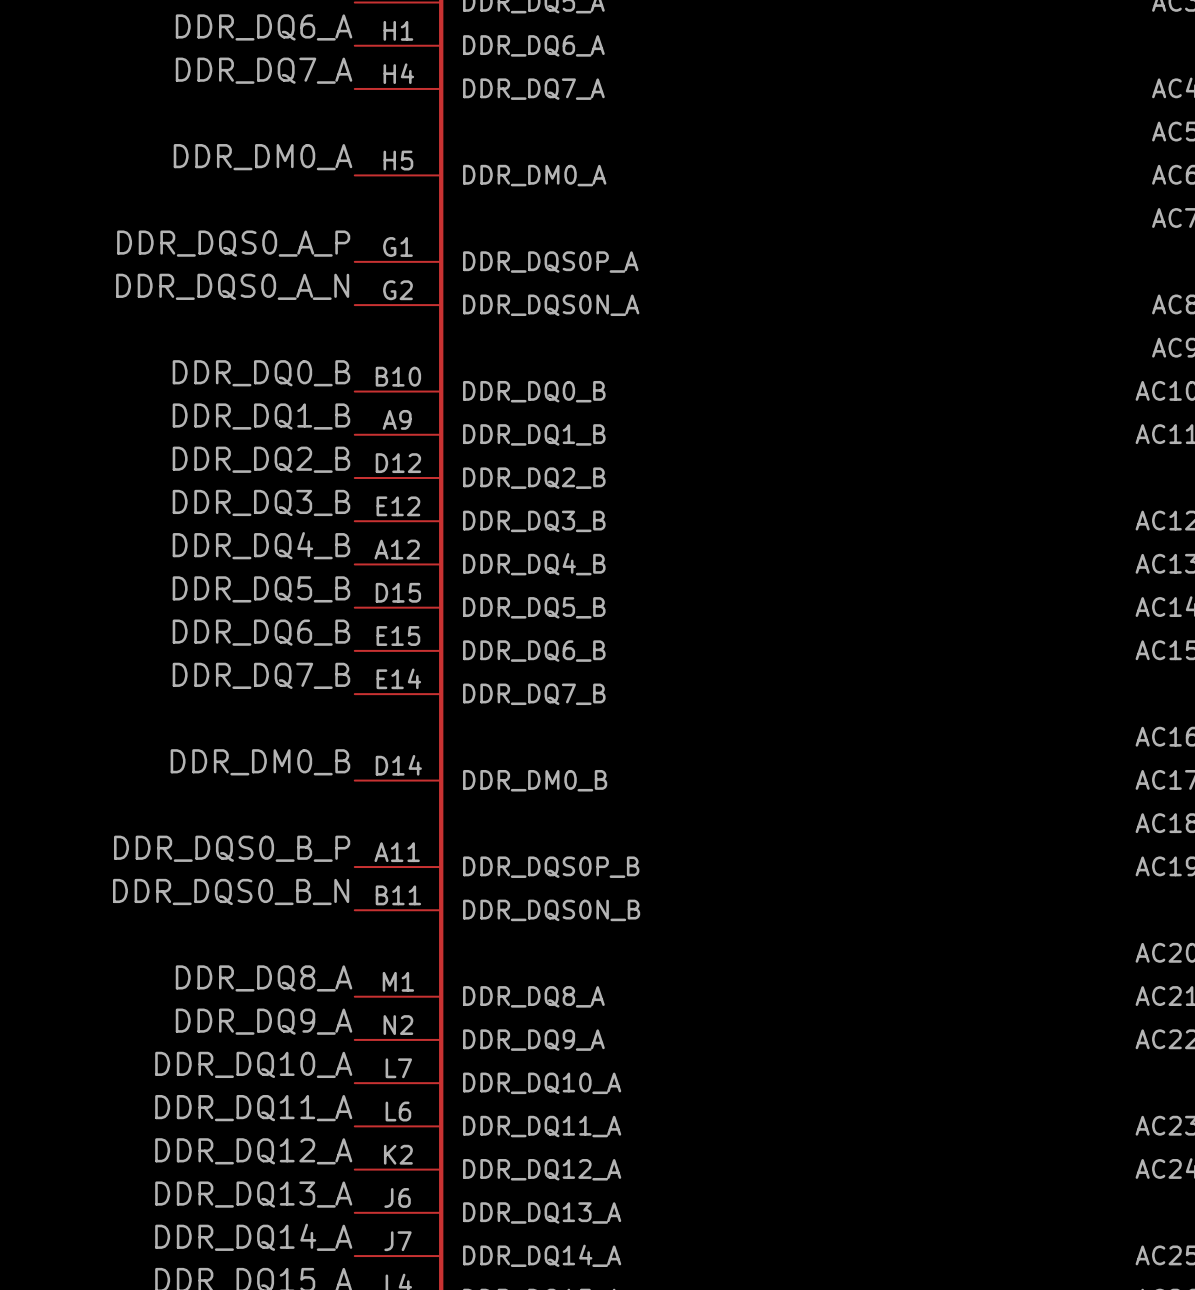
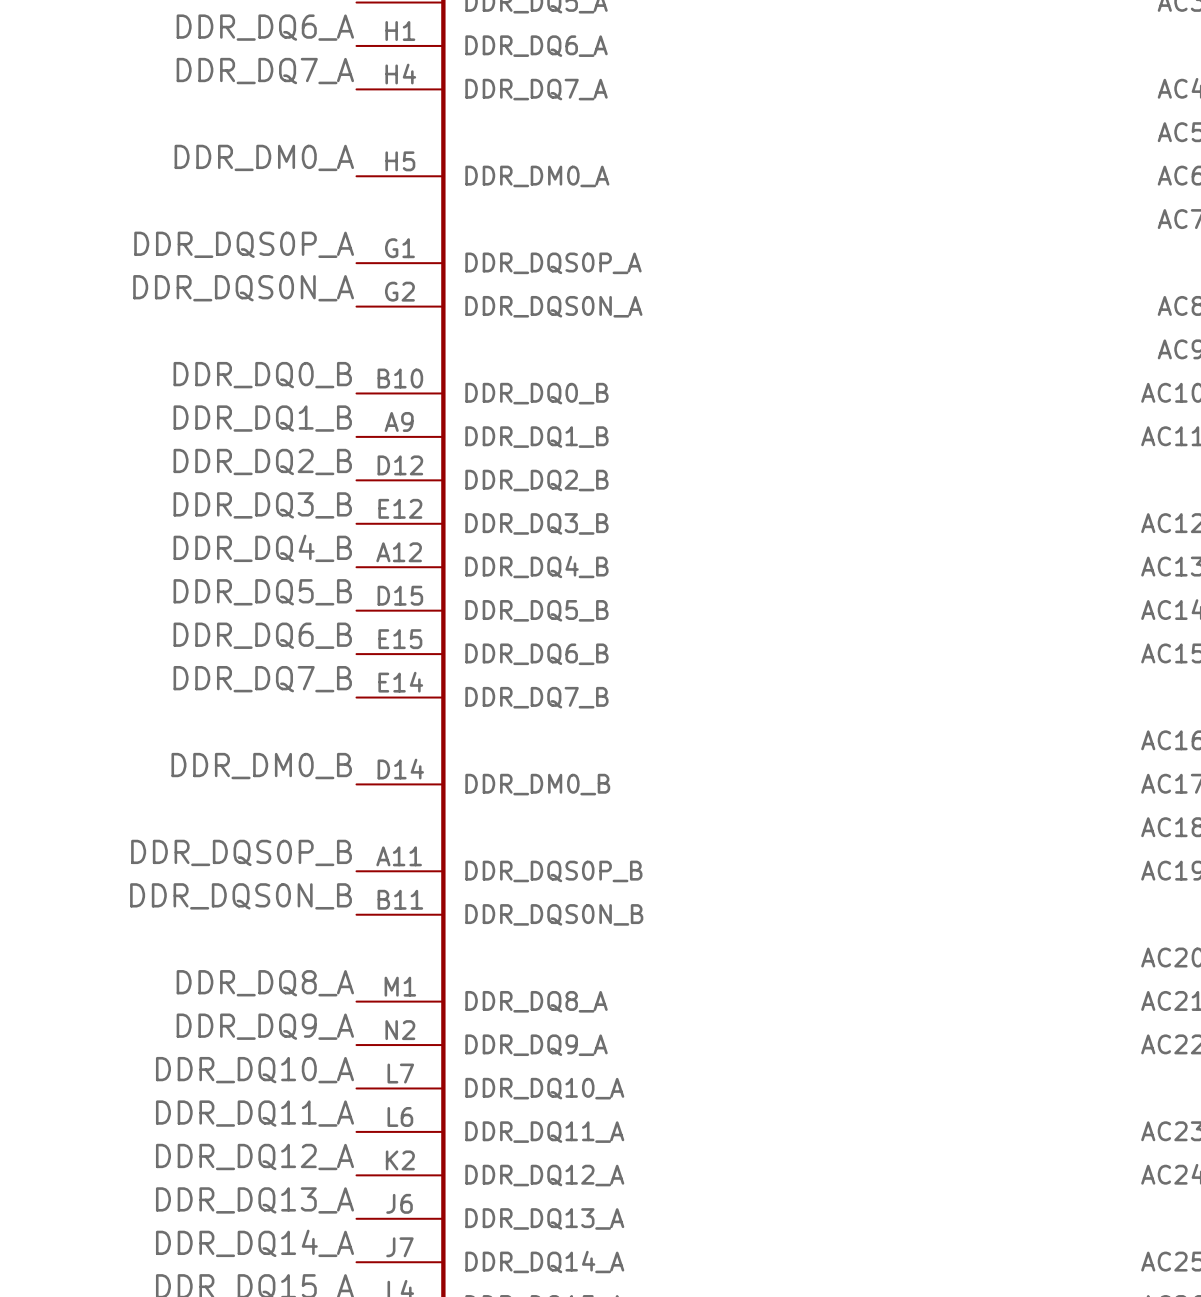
label: DDR_DQS0_A_P (233, 243) -> DDR_DQS0P_A (244, 244)
label: DDR_DQS0_A_N (232, 286) -> DDR_DQS0N_A (243, 288)
label: DDR_DQS0_B_P (232, 848) -> DDR_DQS0P_B (241, 852)
label: DDR_DQS0_B_N (231, 891) -> DDR_DQS0N_B (241, 896)

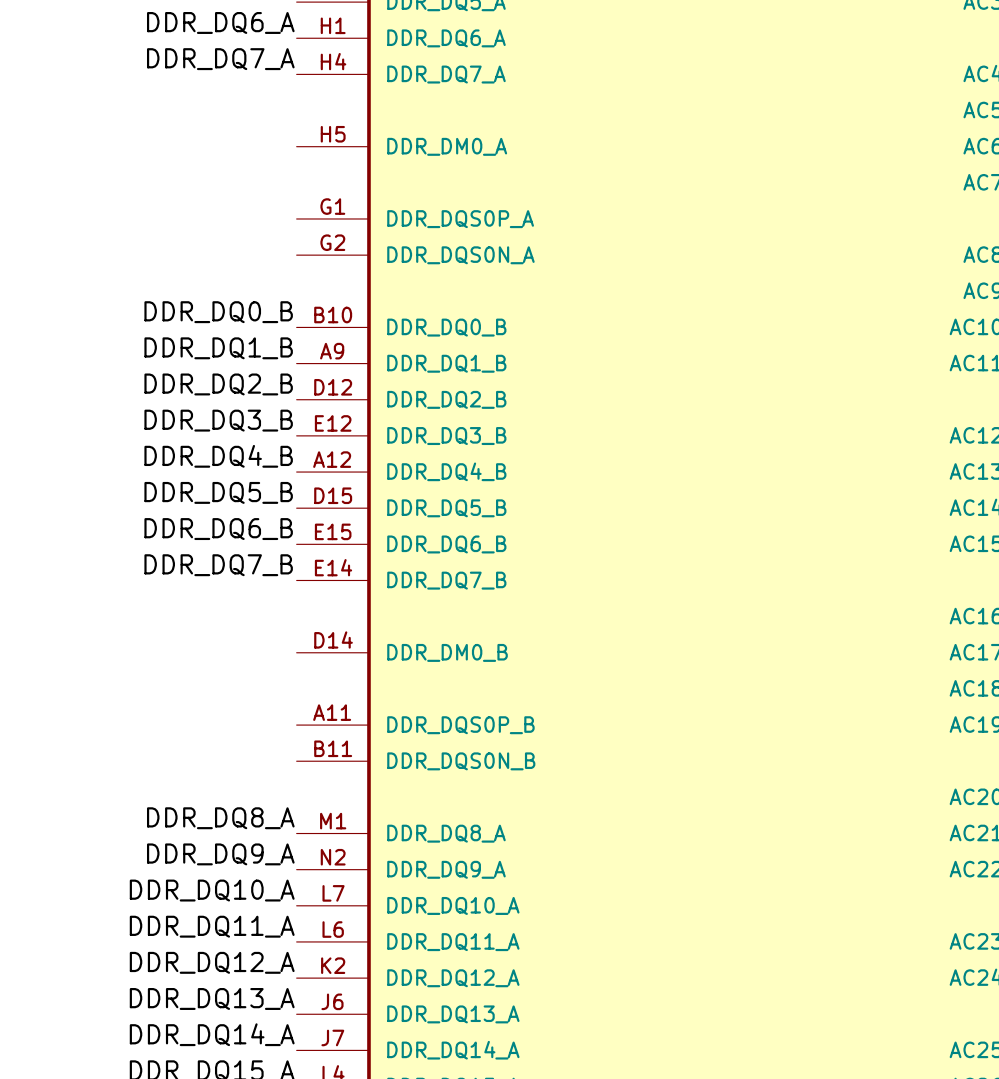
label: DDR_DM0_A (264, 157) -> none
label: DDR_DQS0P_A (244, 244) -> none
label: DDR_DQS0N_A (243, 288) -> none
label: DDR_DM0_B (261, 766) -> none
label: DDR_DQS0P_B (241, 852) -> none
label: DDR_DQS0N_B (241, 896) -> none

